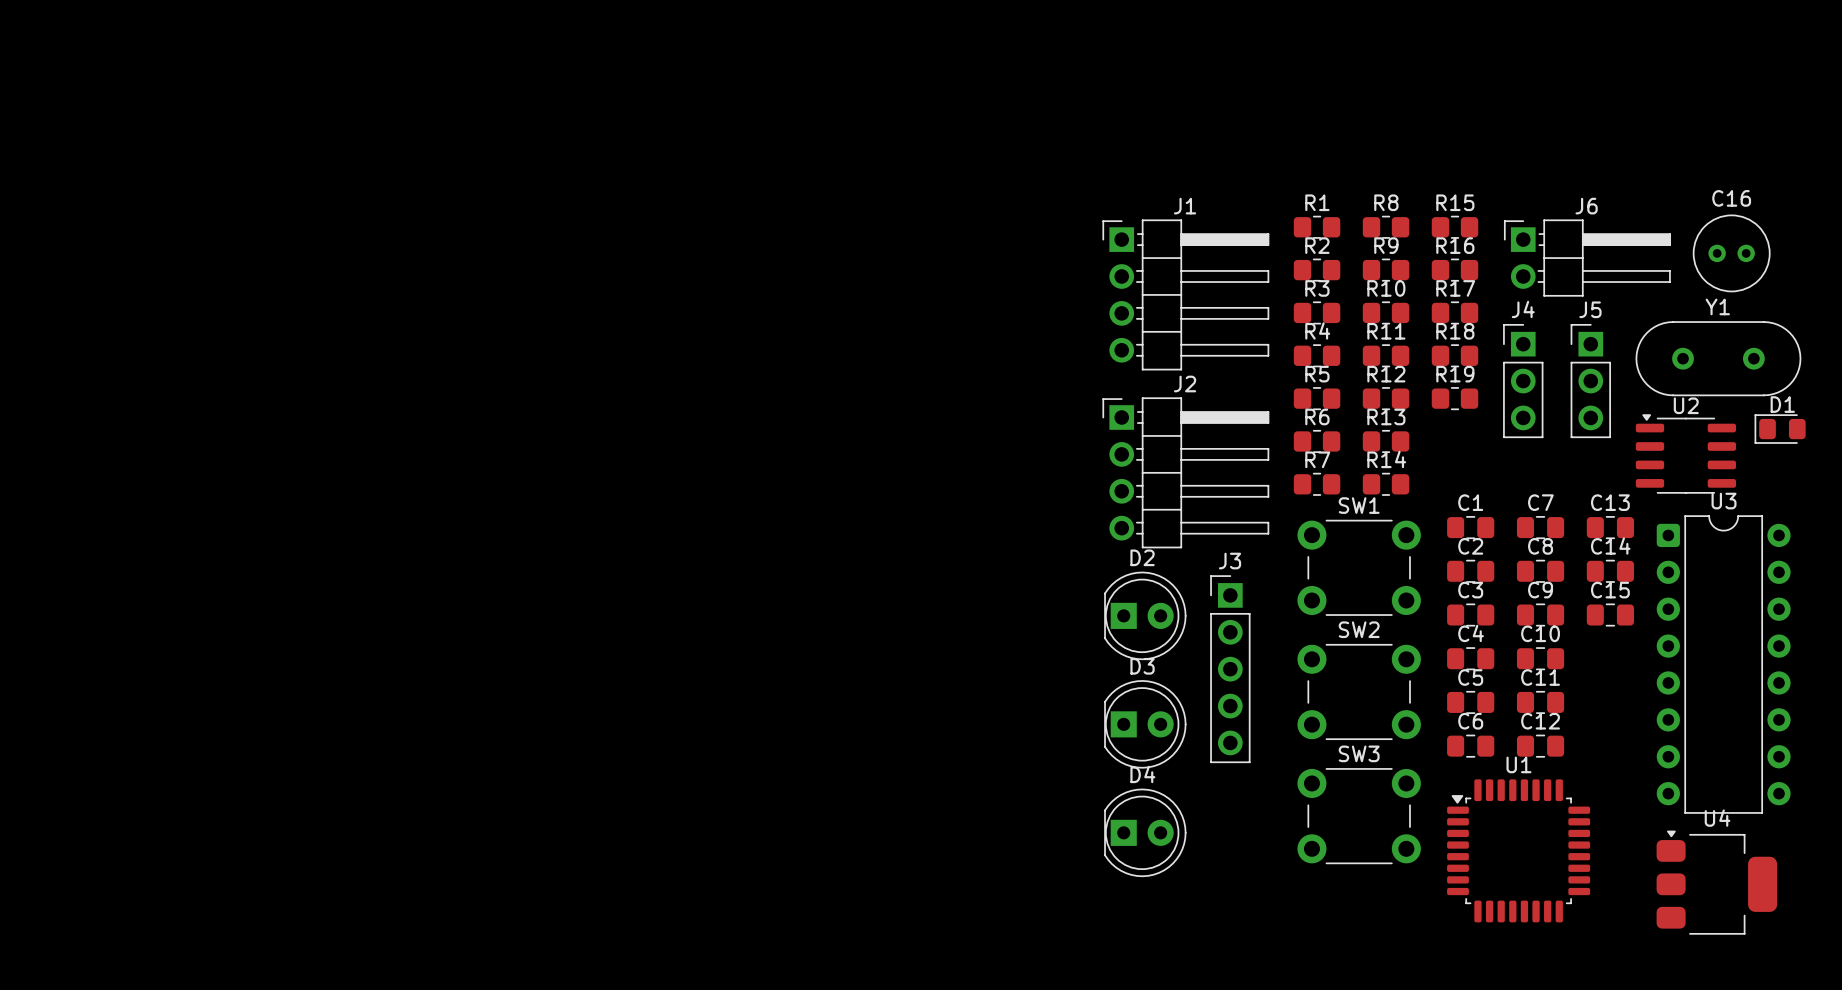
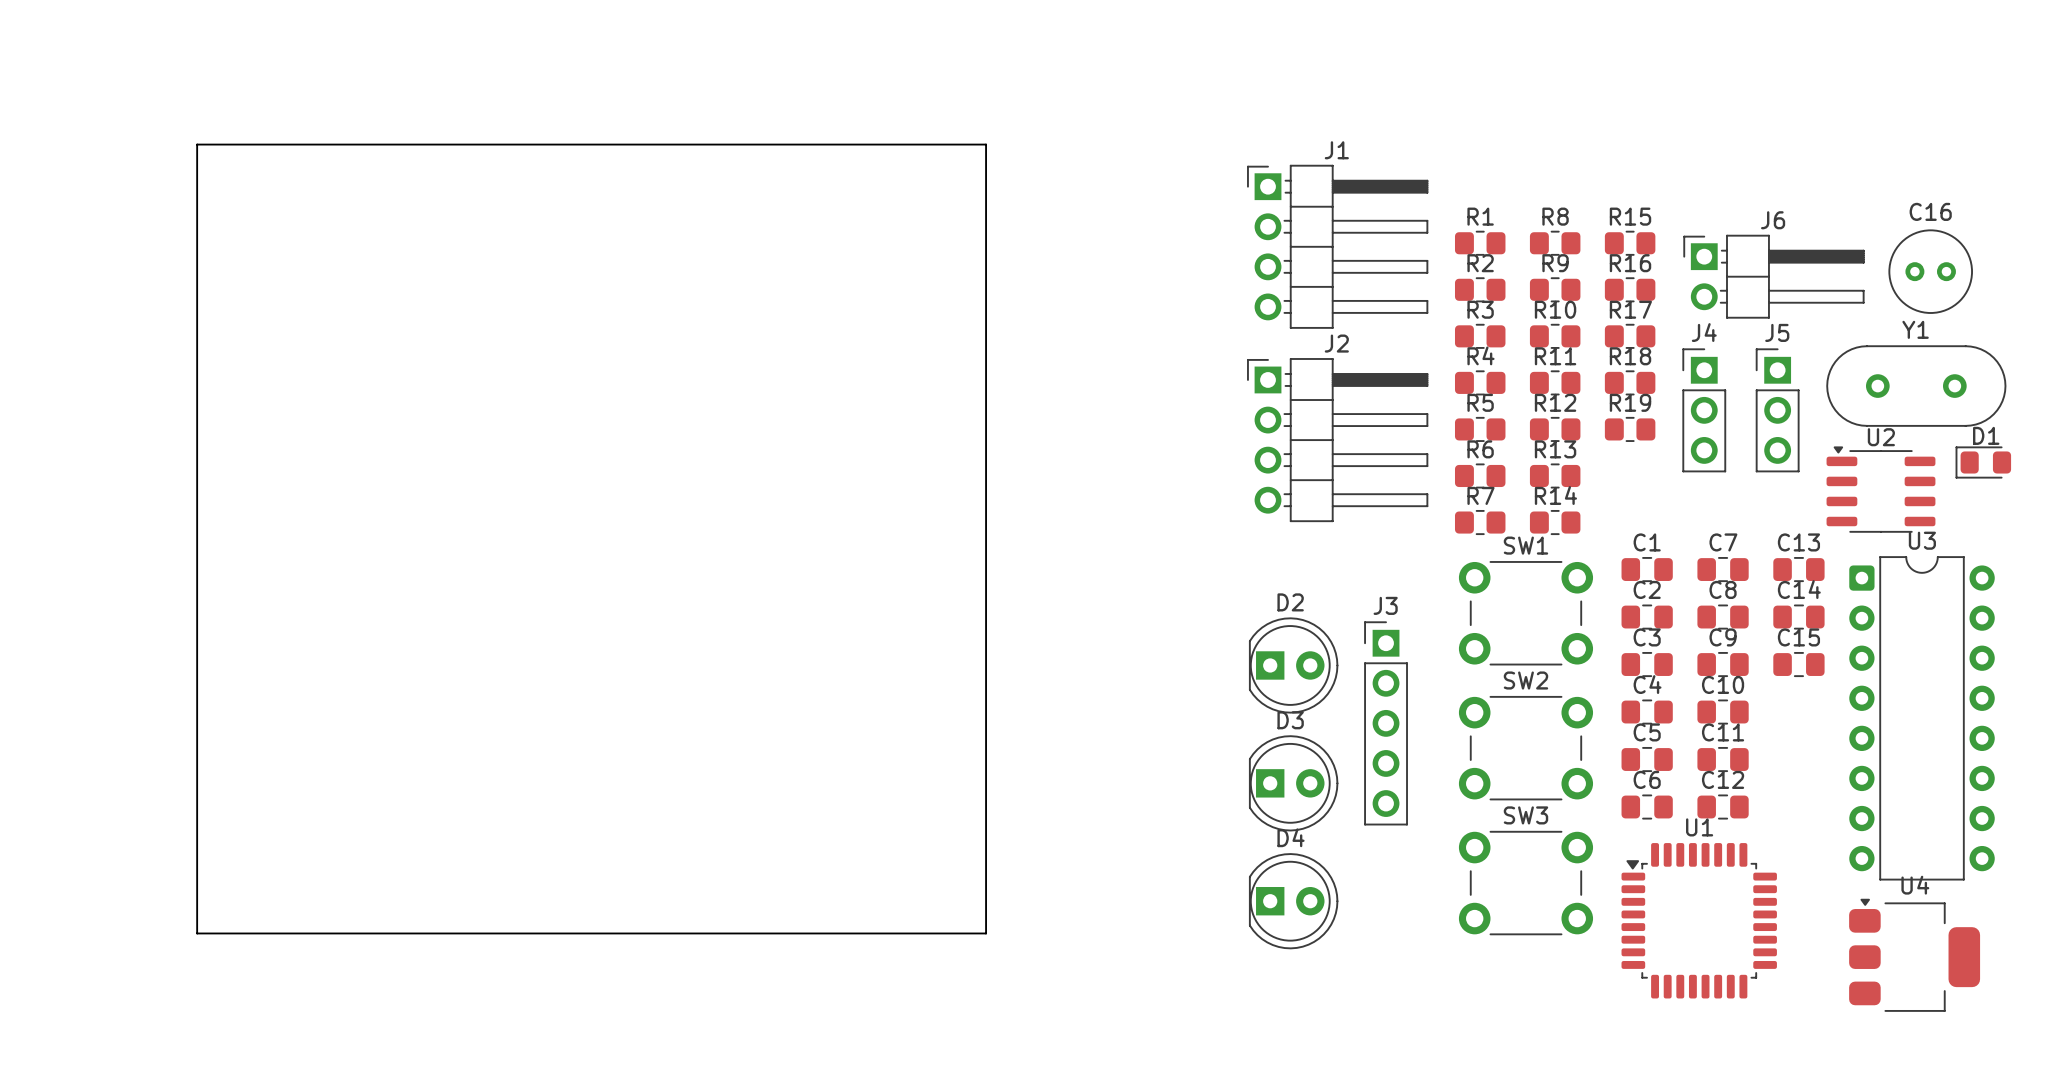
board edge: none -> (197, 144) (986, 144) (986, 933) (197, 933) (197, 144)
J1 position: (1185, 294) -> (1337, 246)
J2 position: (1185, 472) -> (1337, 440)

